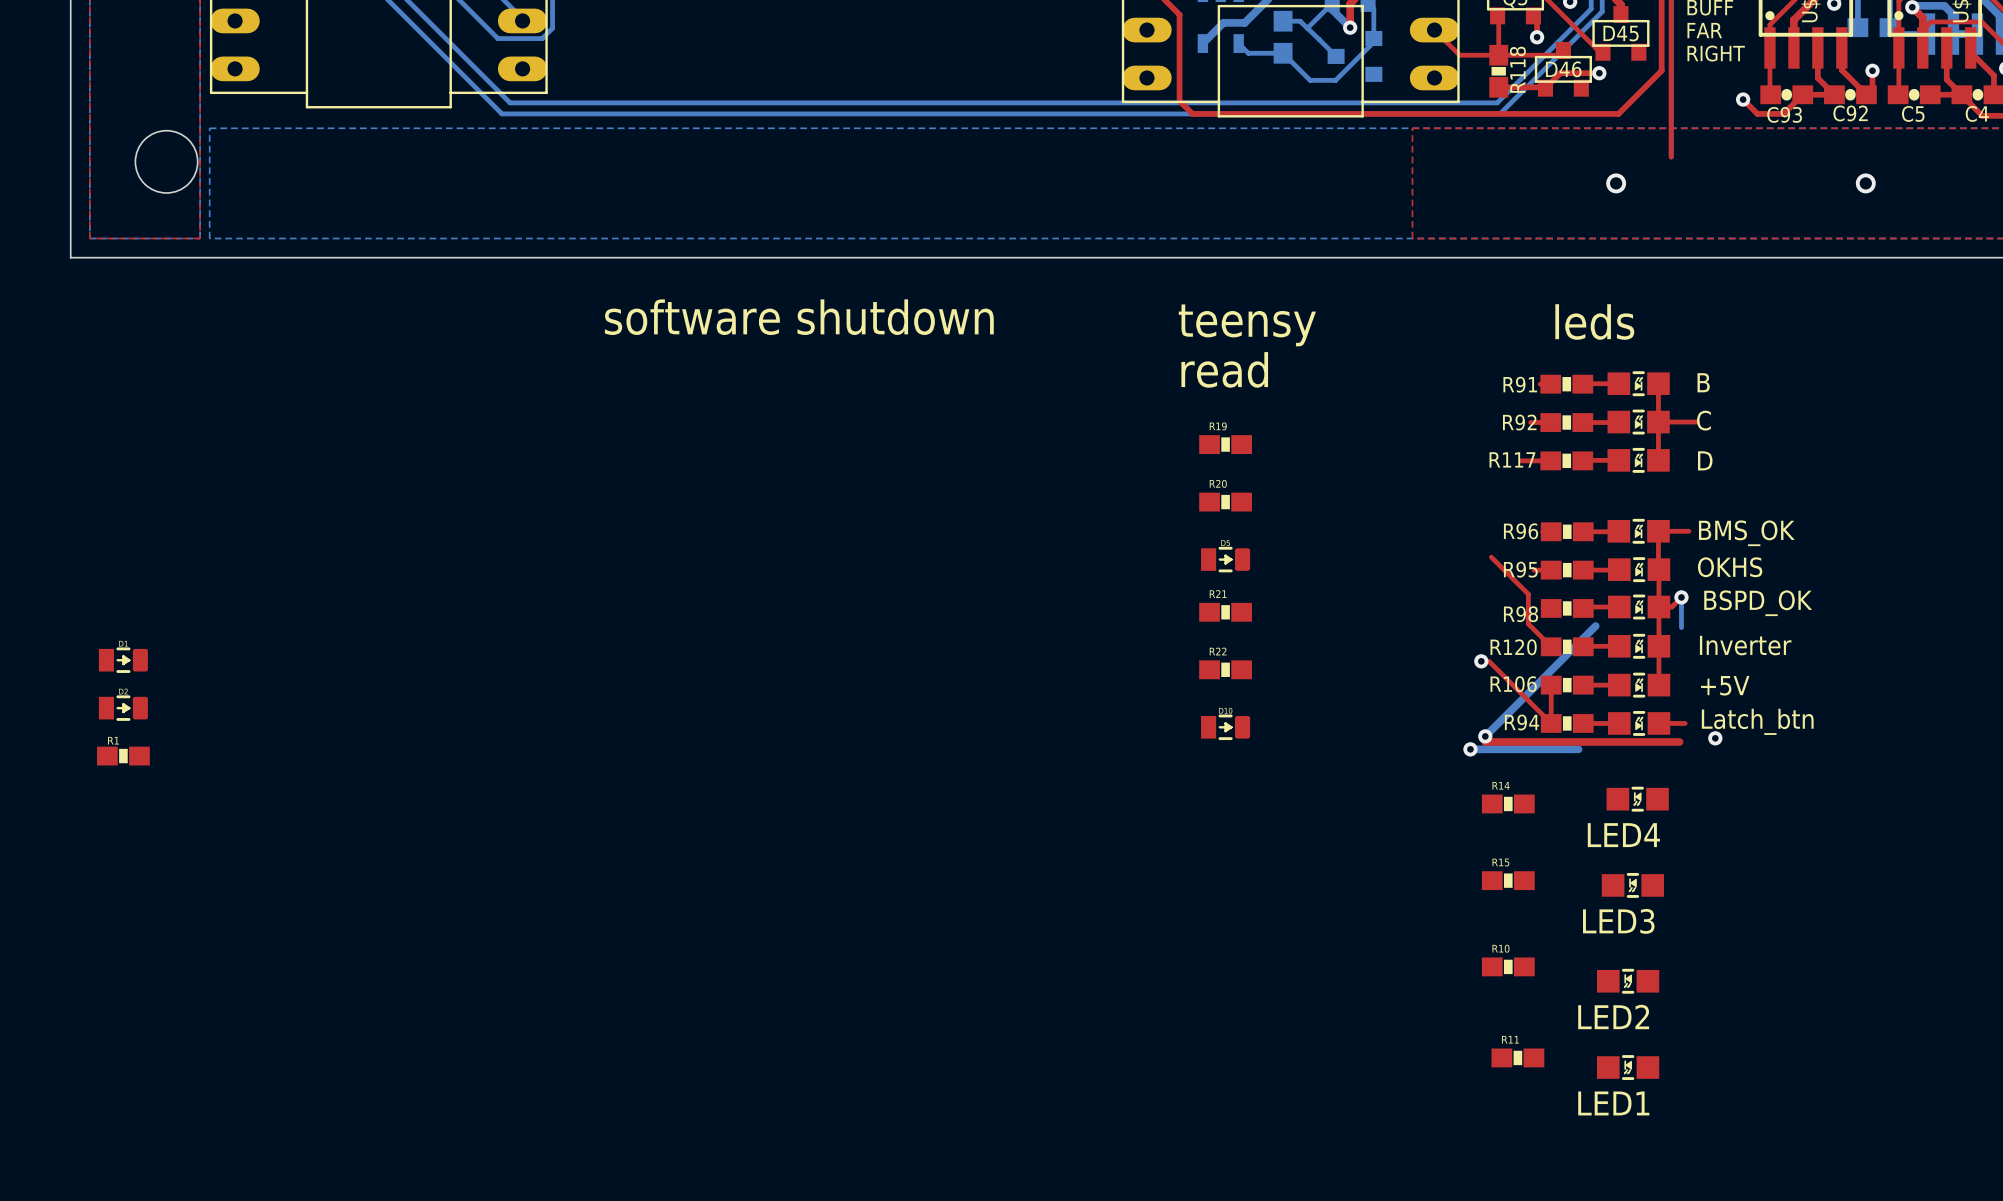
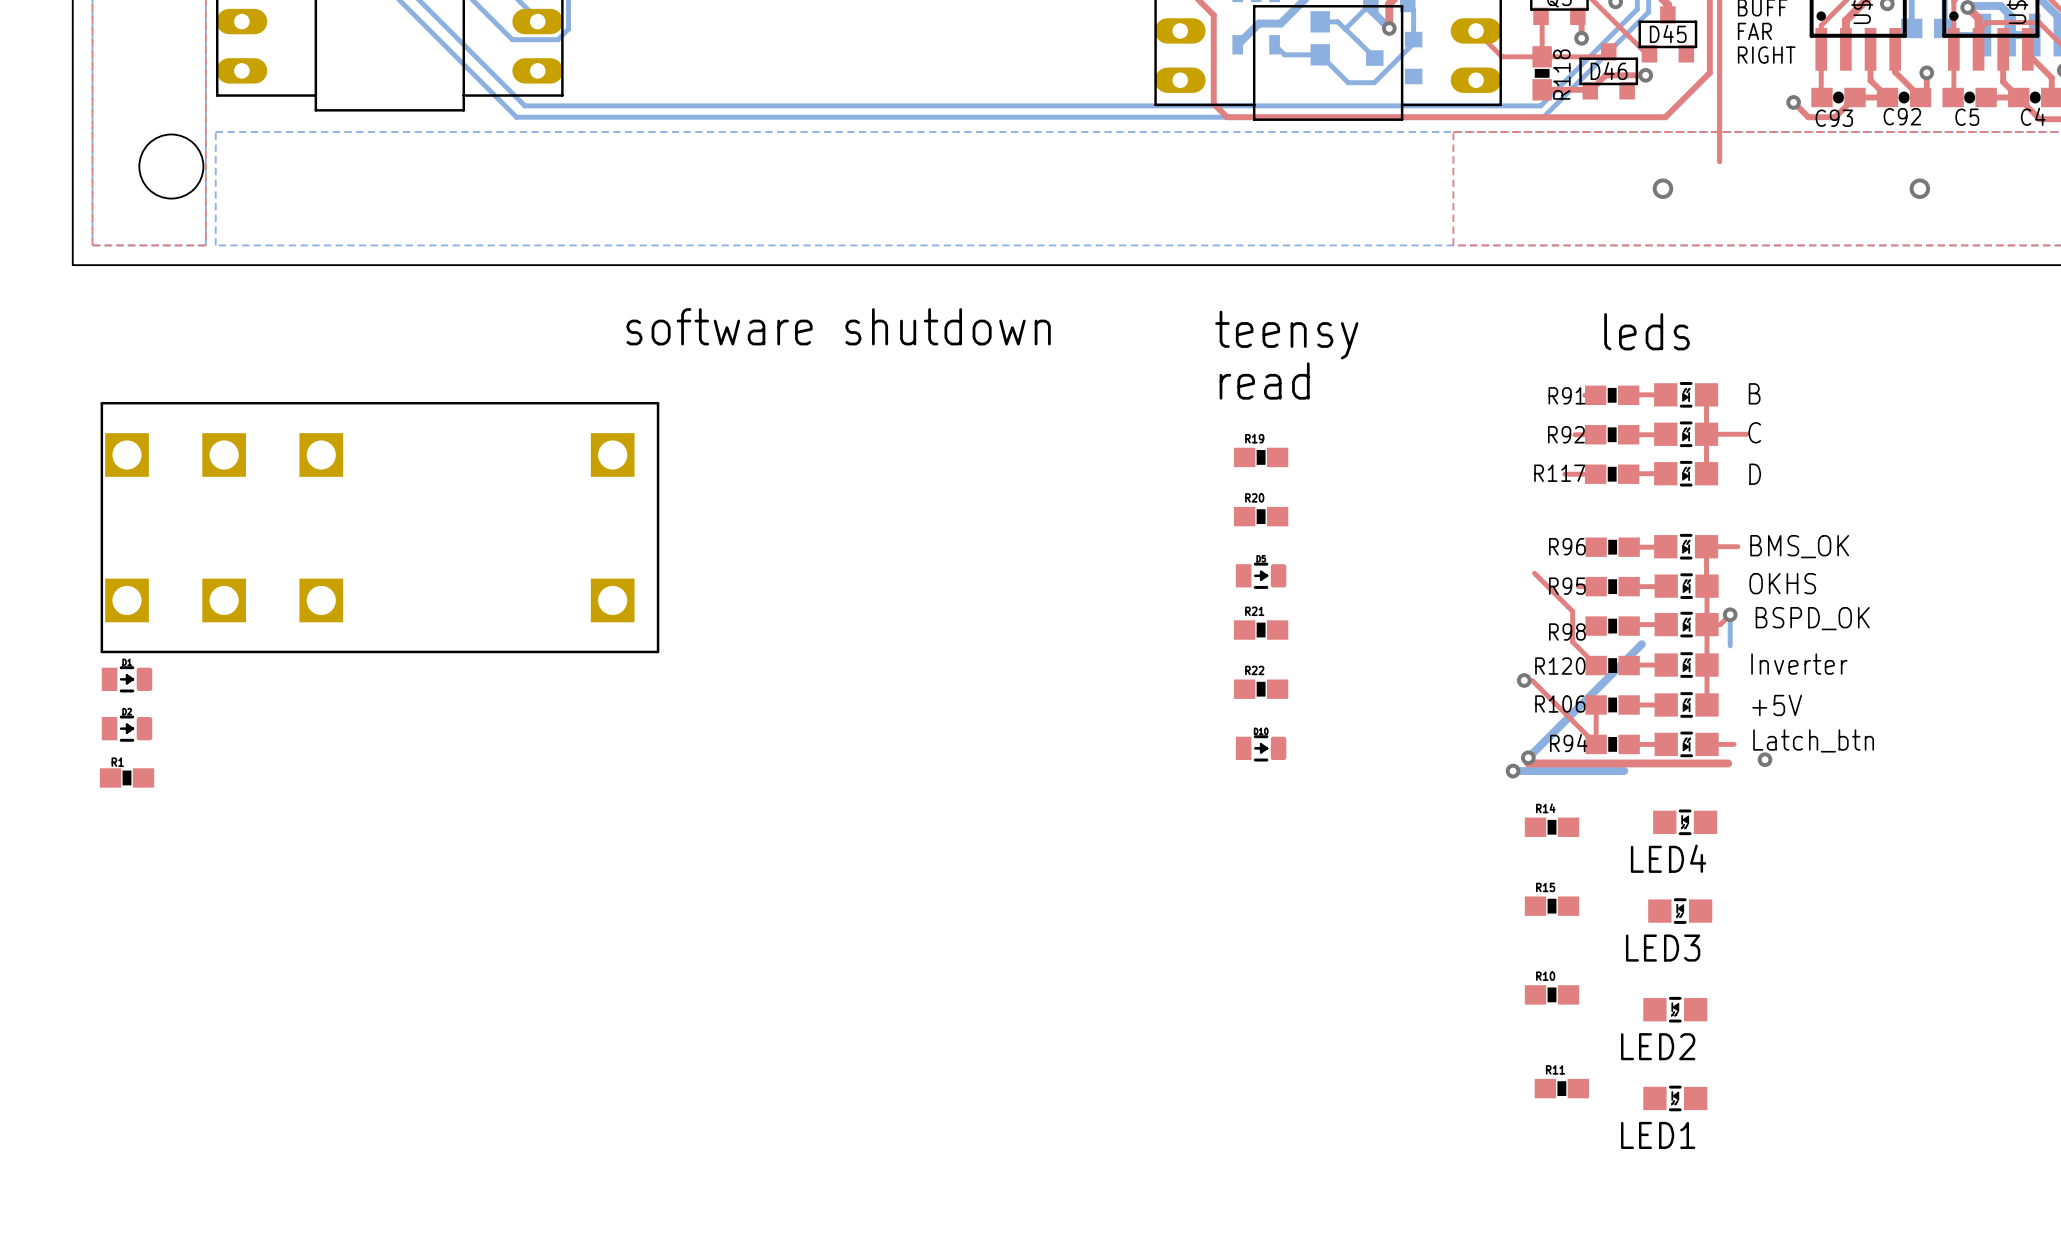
part: none -> (379, 527)

